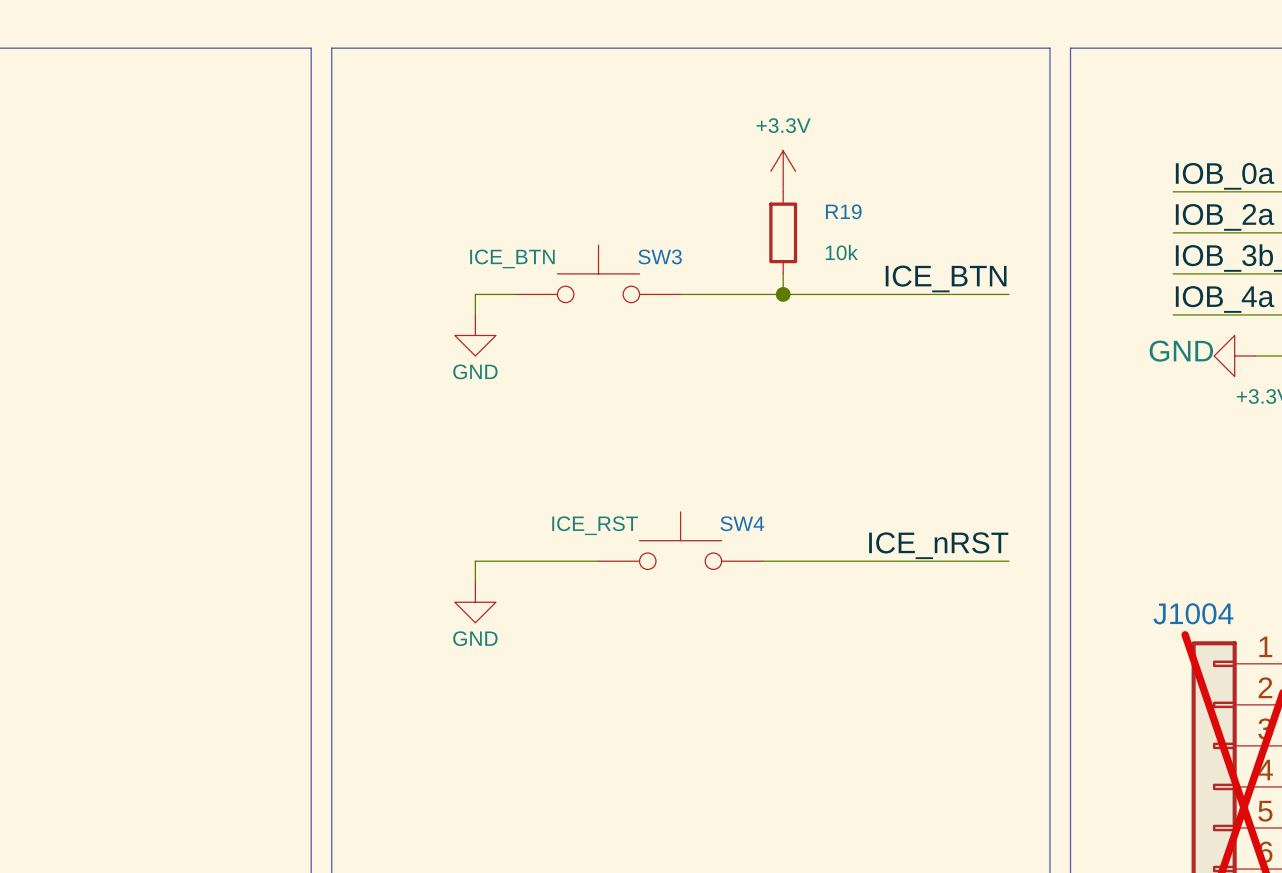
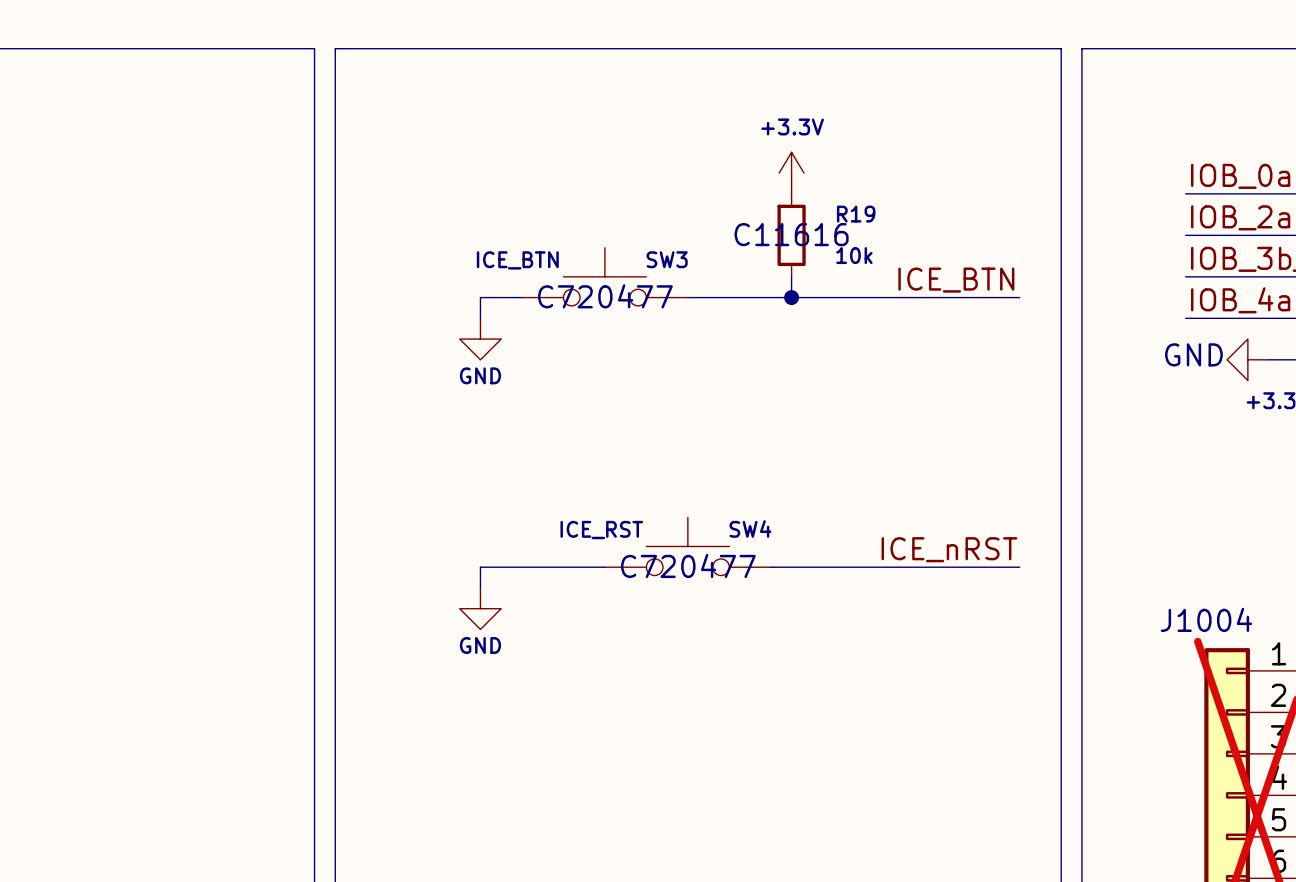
R19 text: none -> C11616 (791, 234)
SW3 text: none -> C720477 (605, 296)
SW4 text: none -> C720477 (688, 565)

